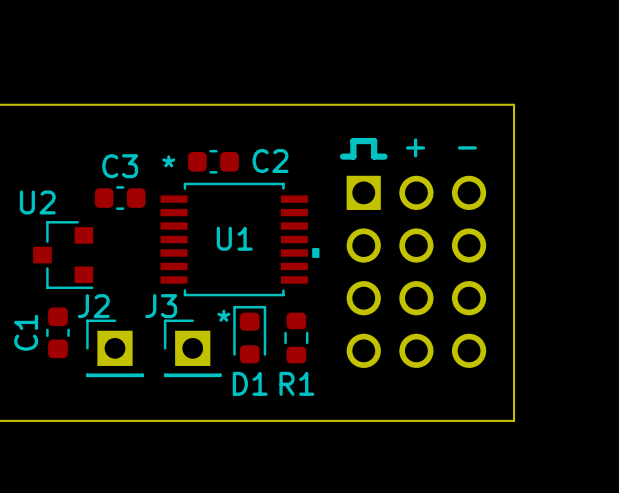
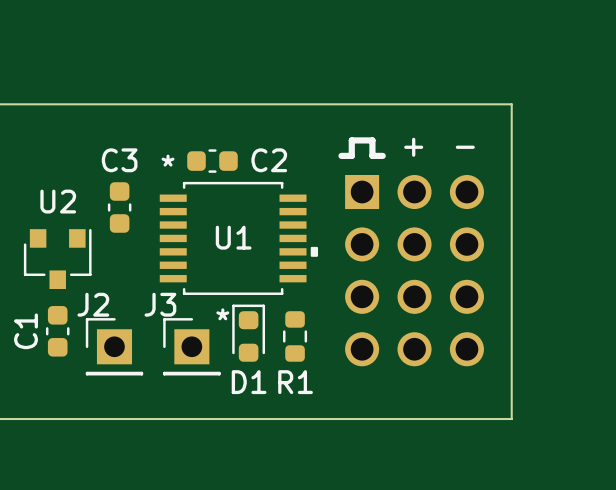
C3 rotation: 0° (120, 198) -> 90° clockwise (119, 207)
U2 rotation: 0° (63, 255) -> 90° counterclockwise (57, 258)

